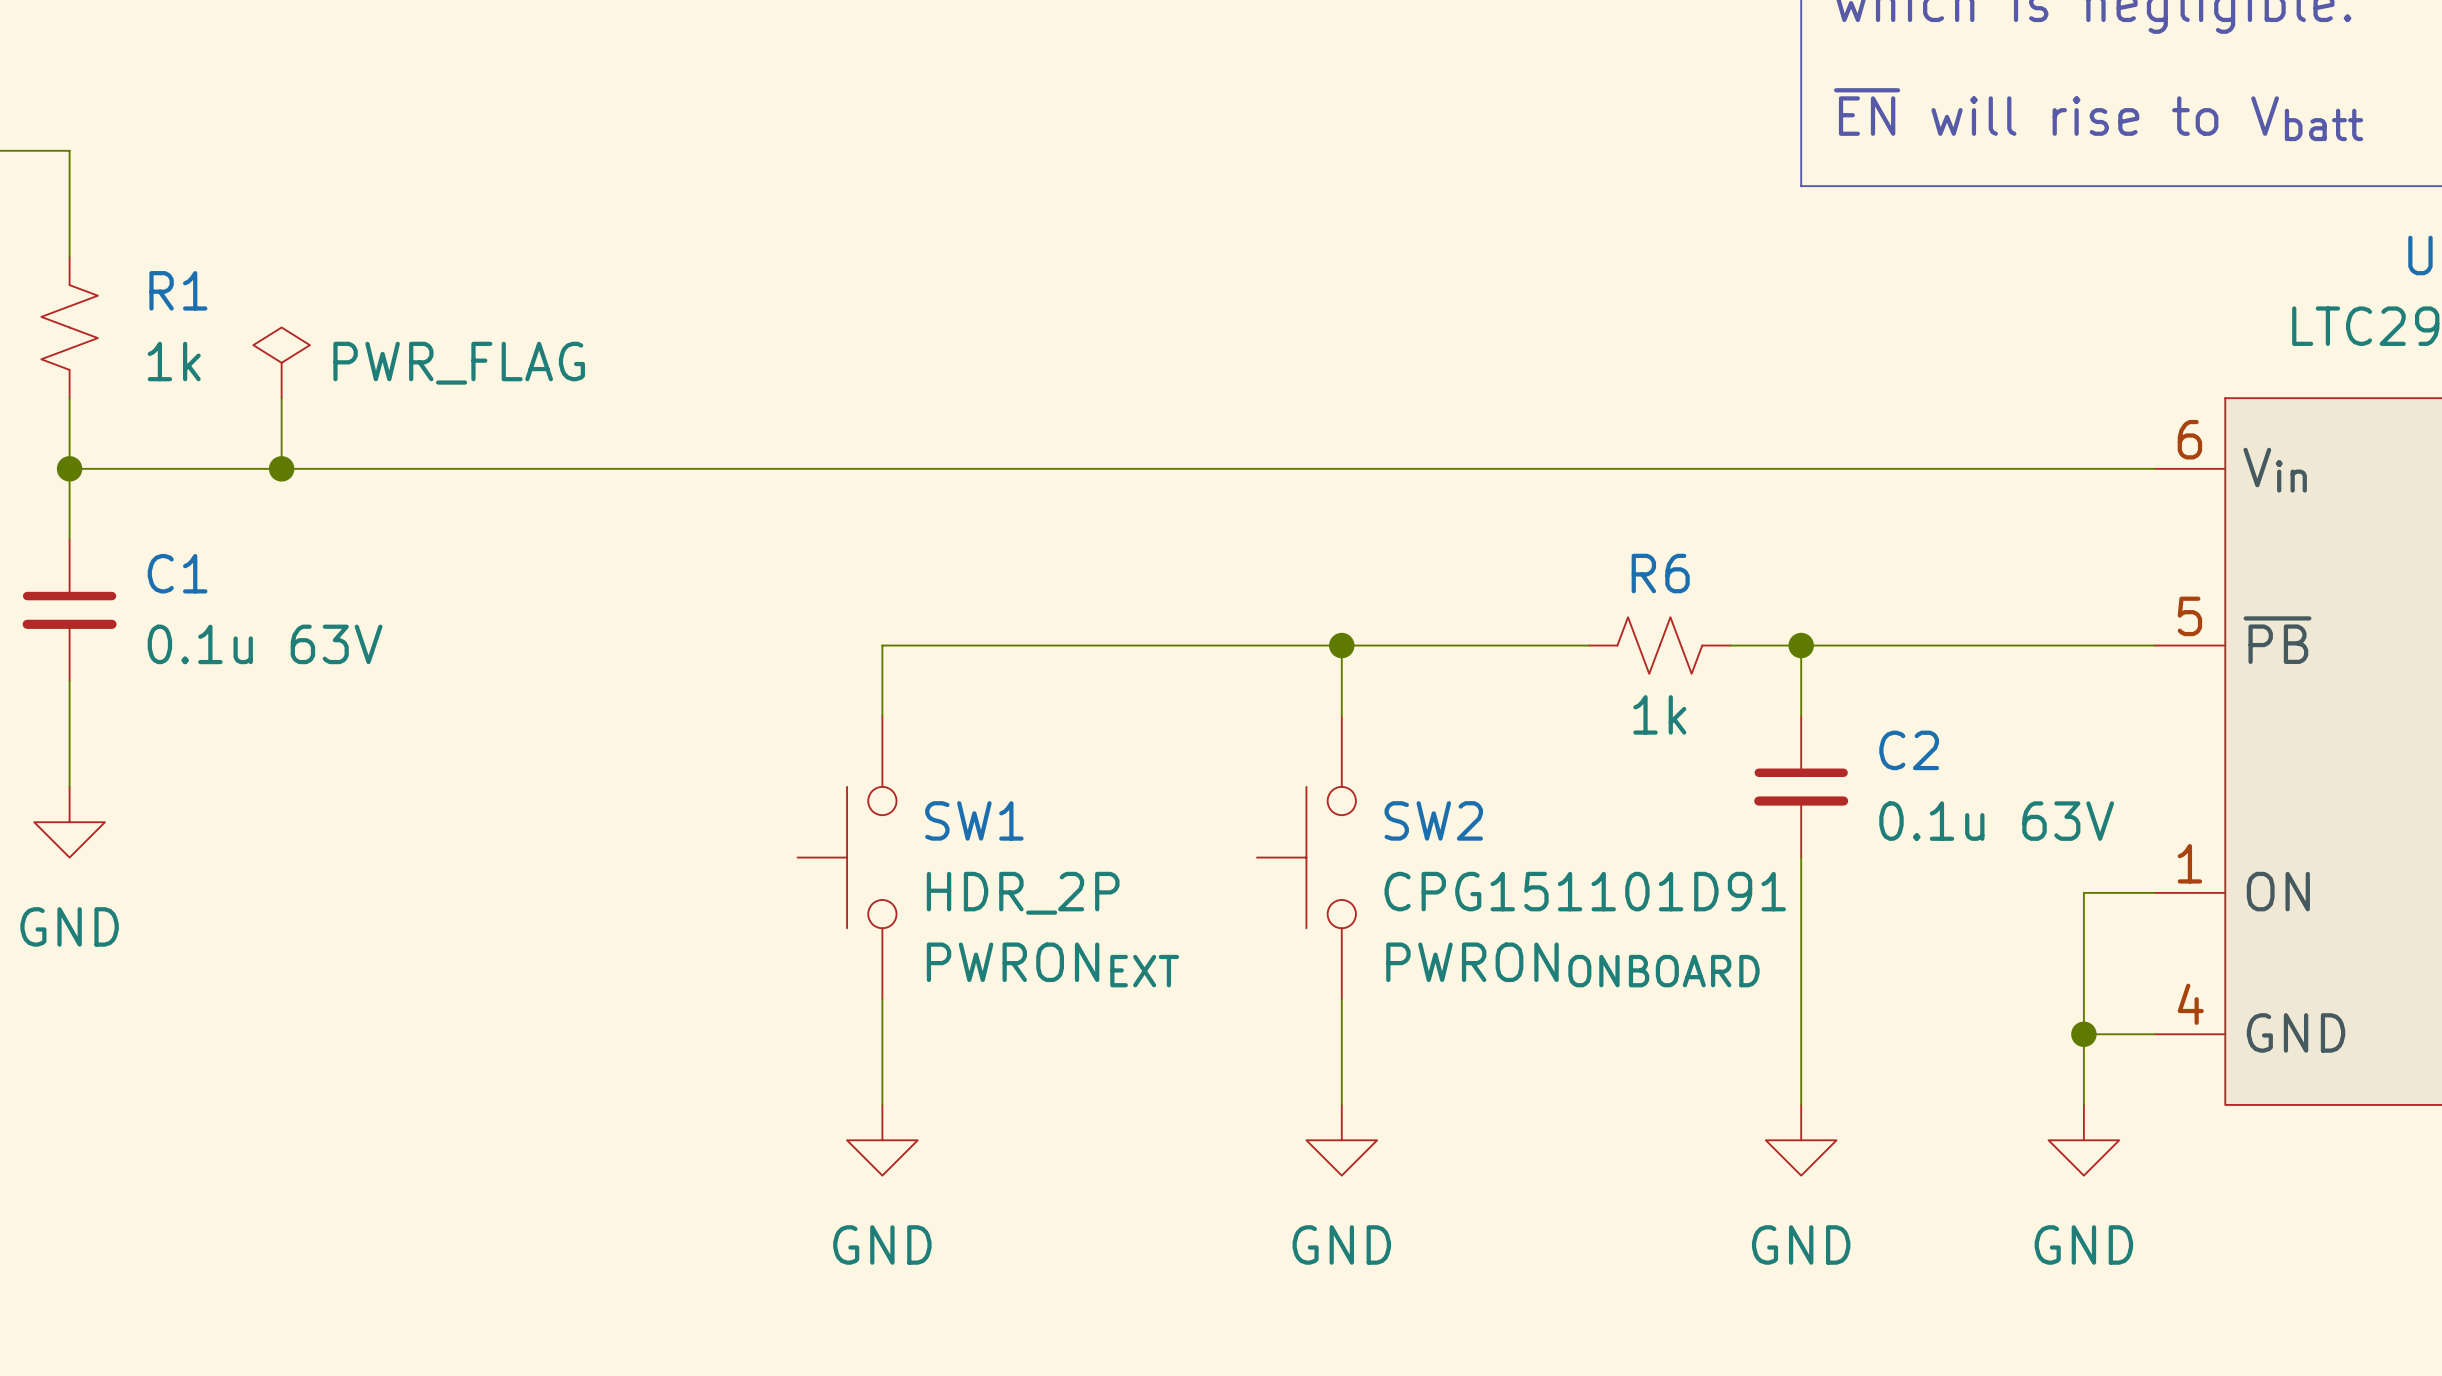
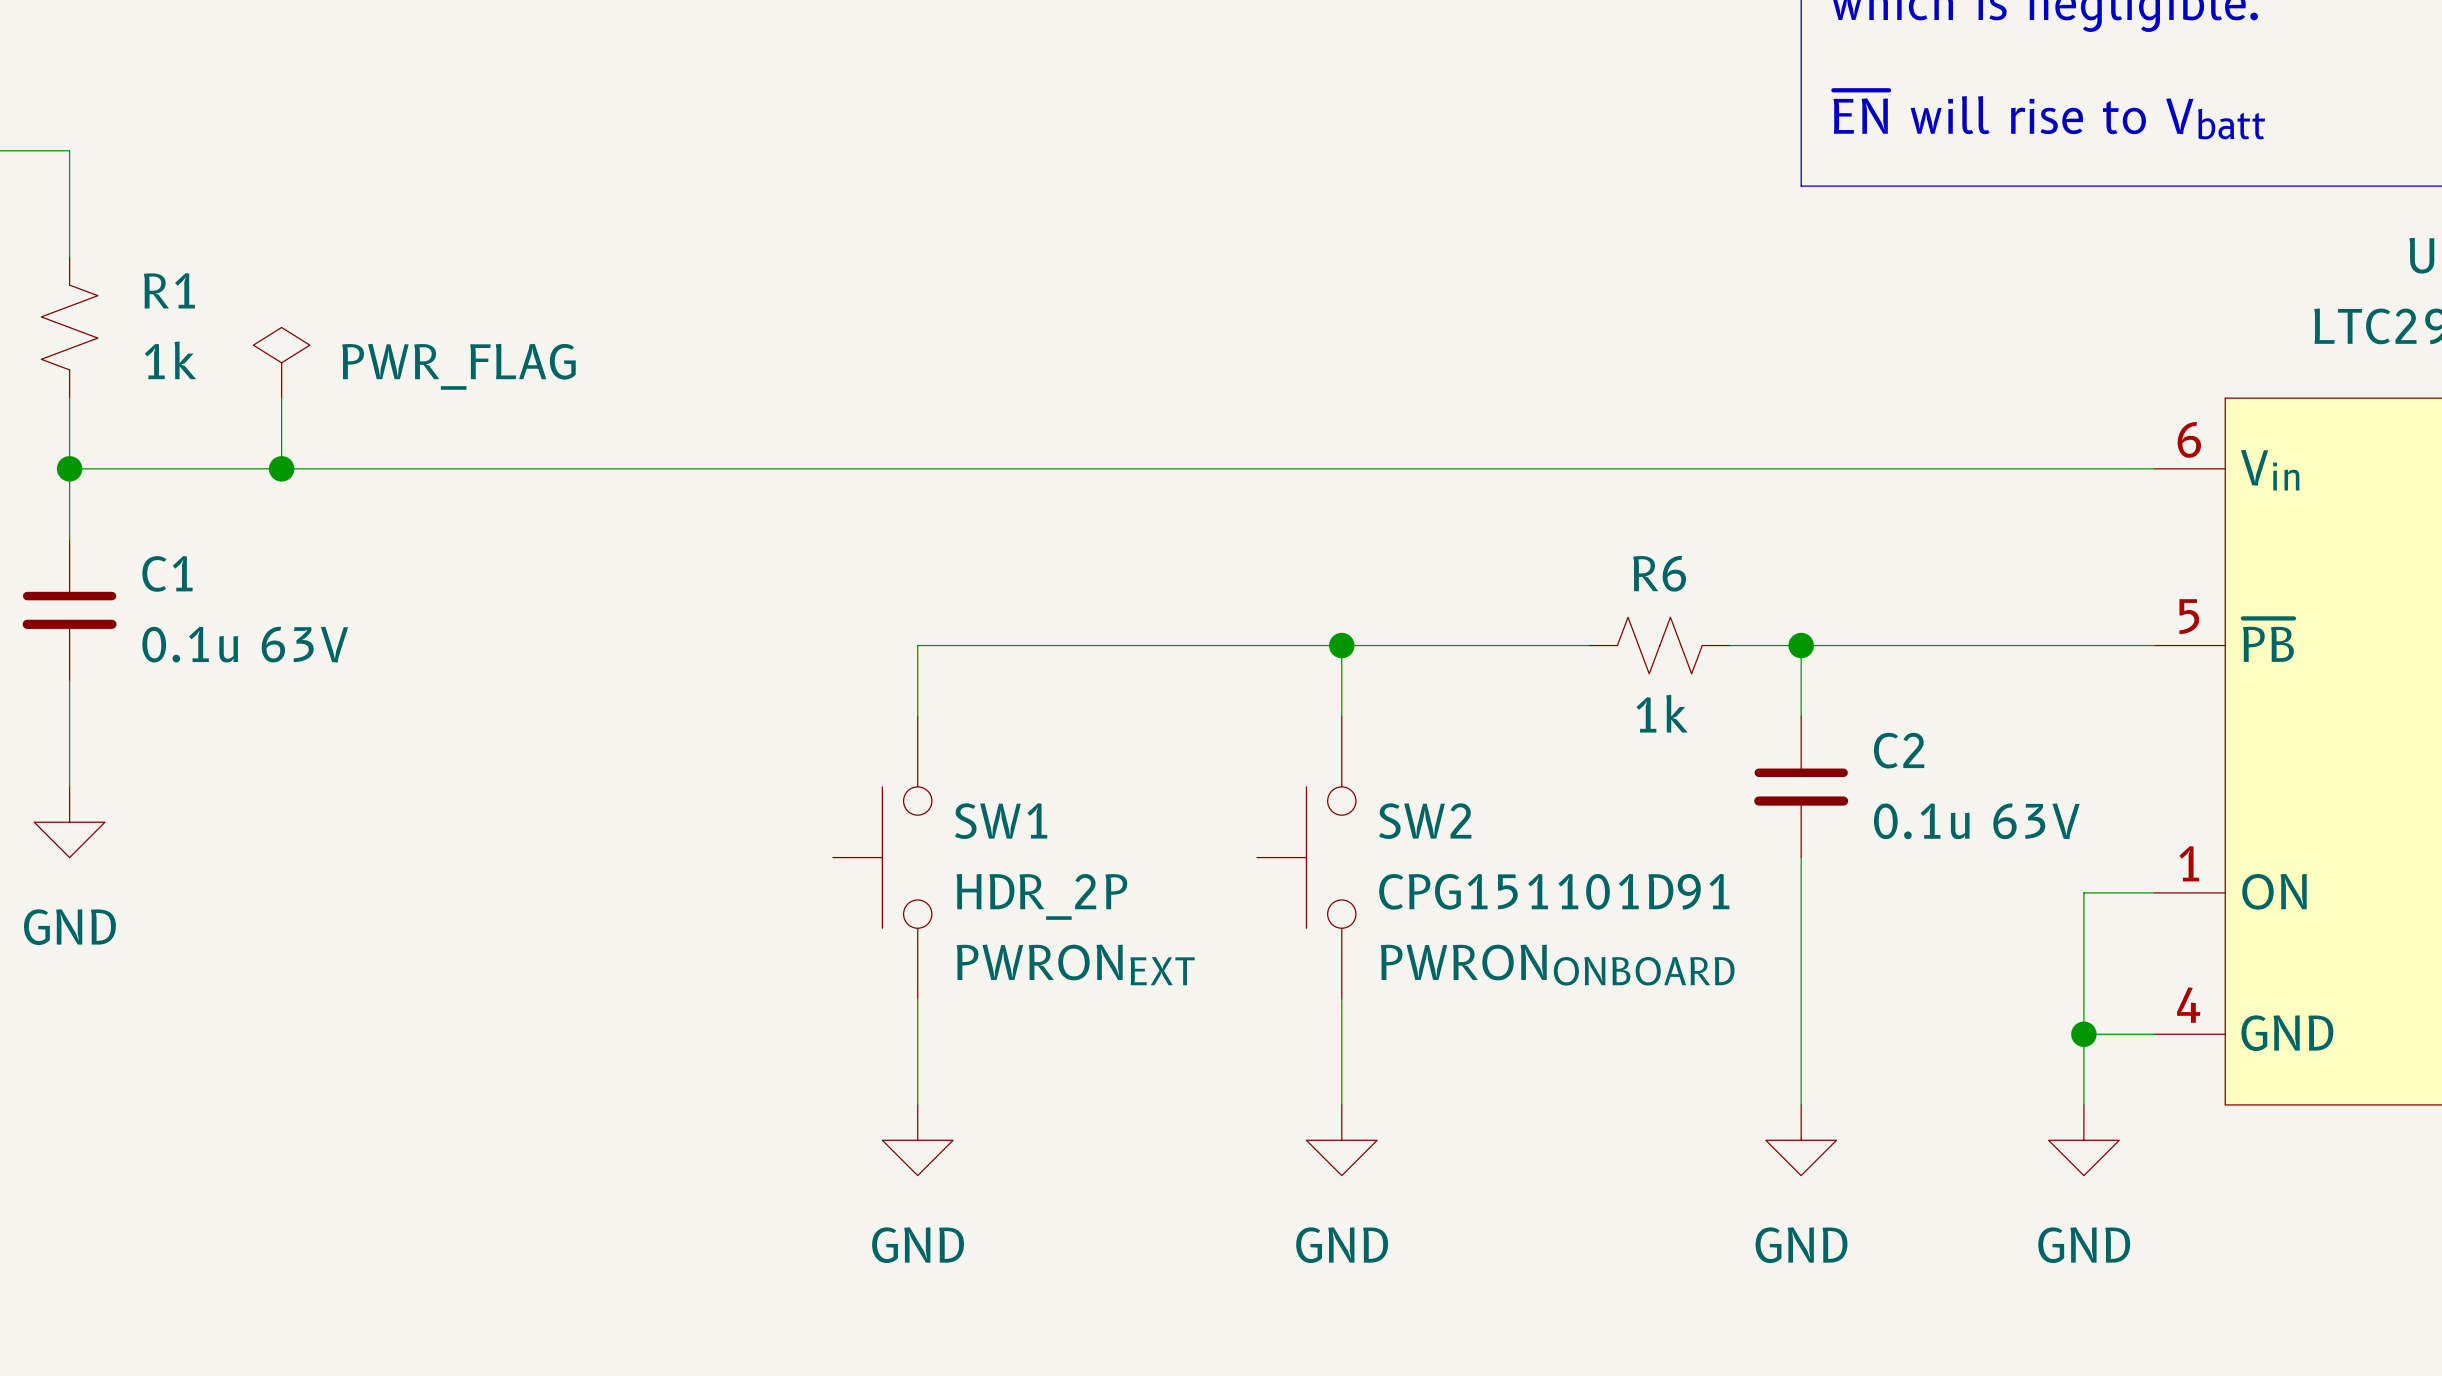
wire: (917, 645) (882, 645) (882, 716) -> (917, 645) (917, 716)
SW1 position: (847, 857) -> (882, 857)
wire: (882, 998) (882, 1104) -> (917, 998) (917, 1104)
power symbol position: GND (882, 1140) -> GND (917, 1140)

